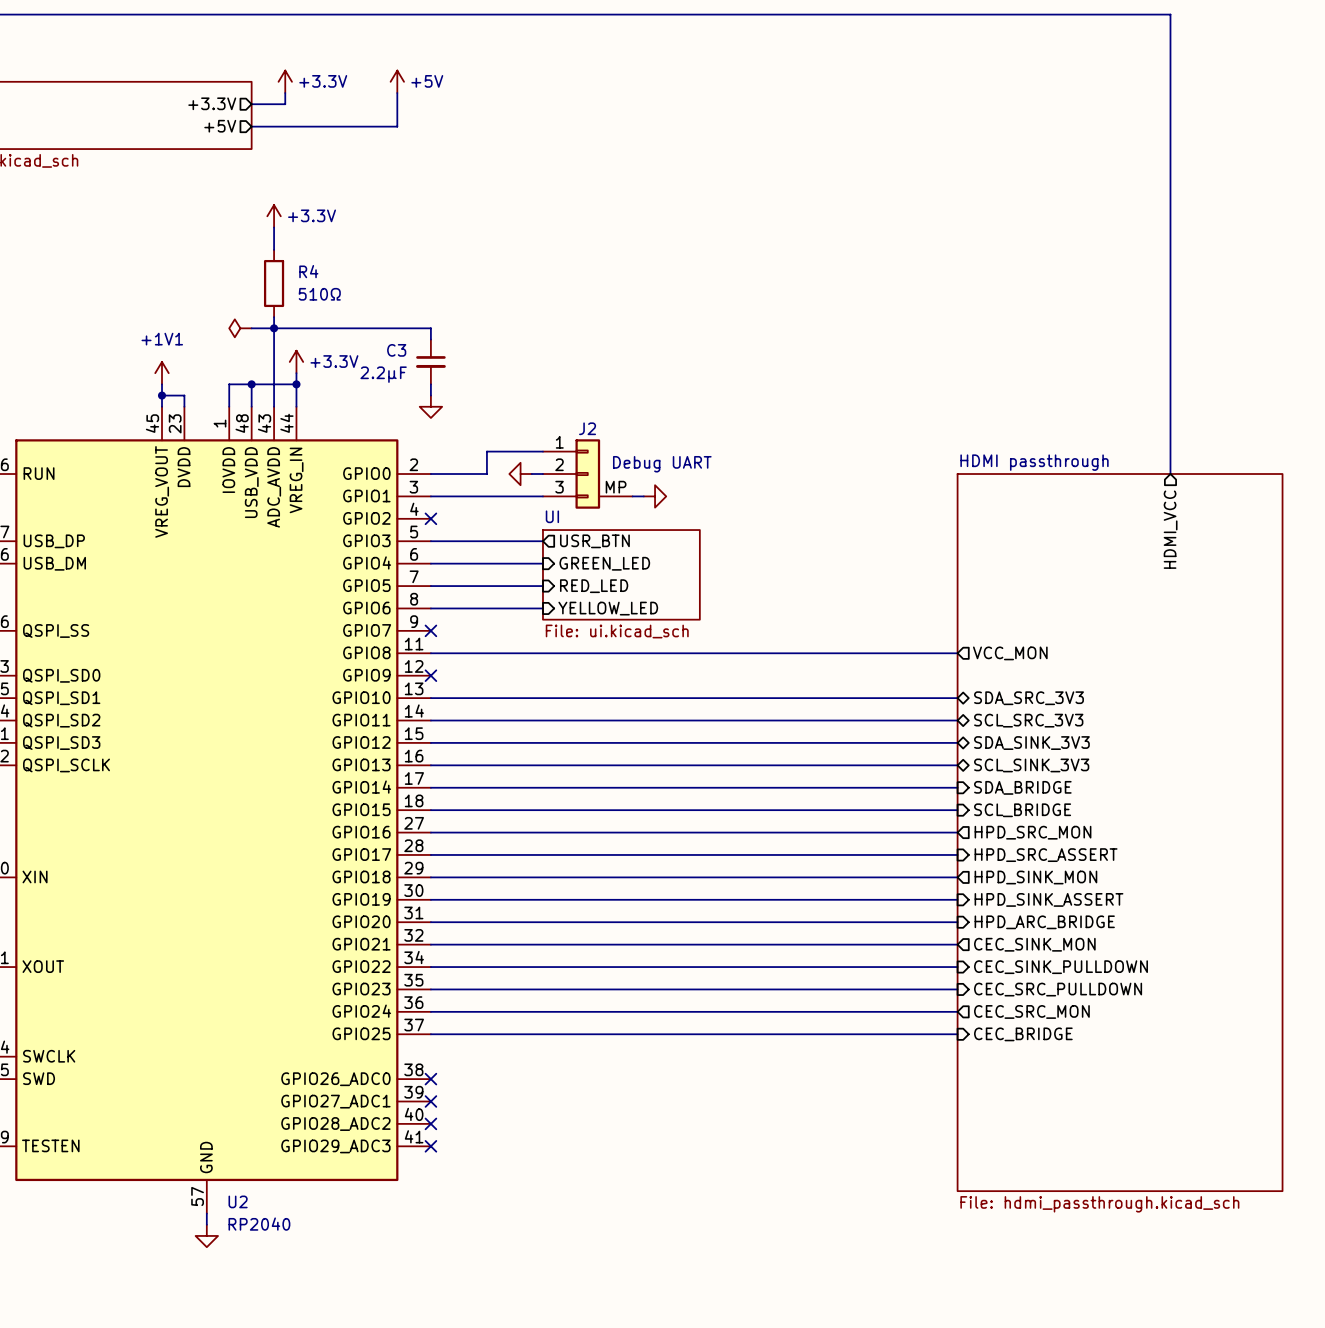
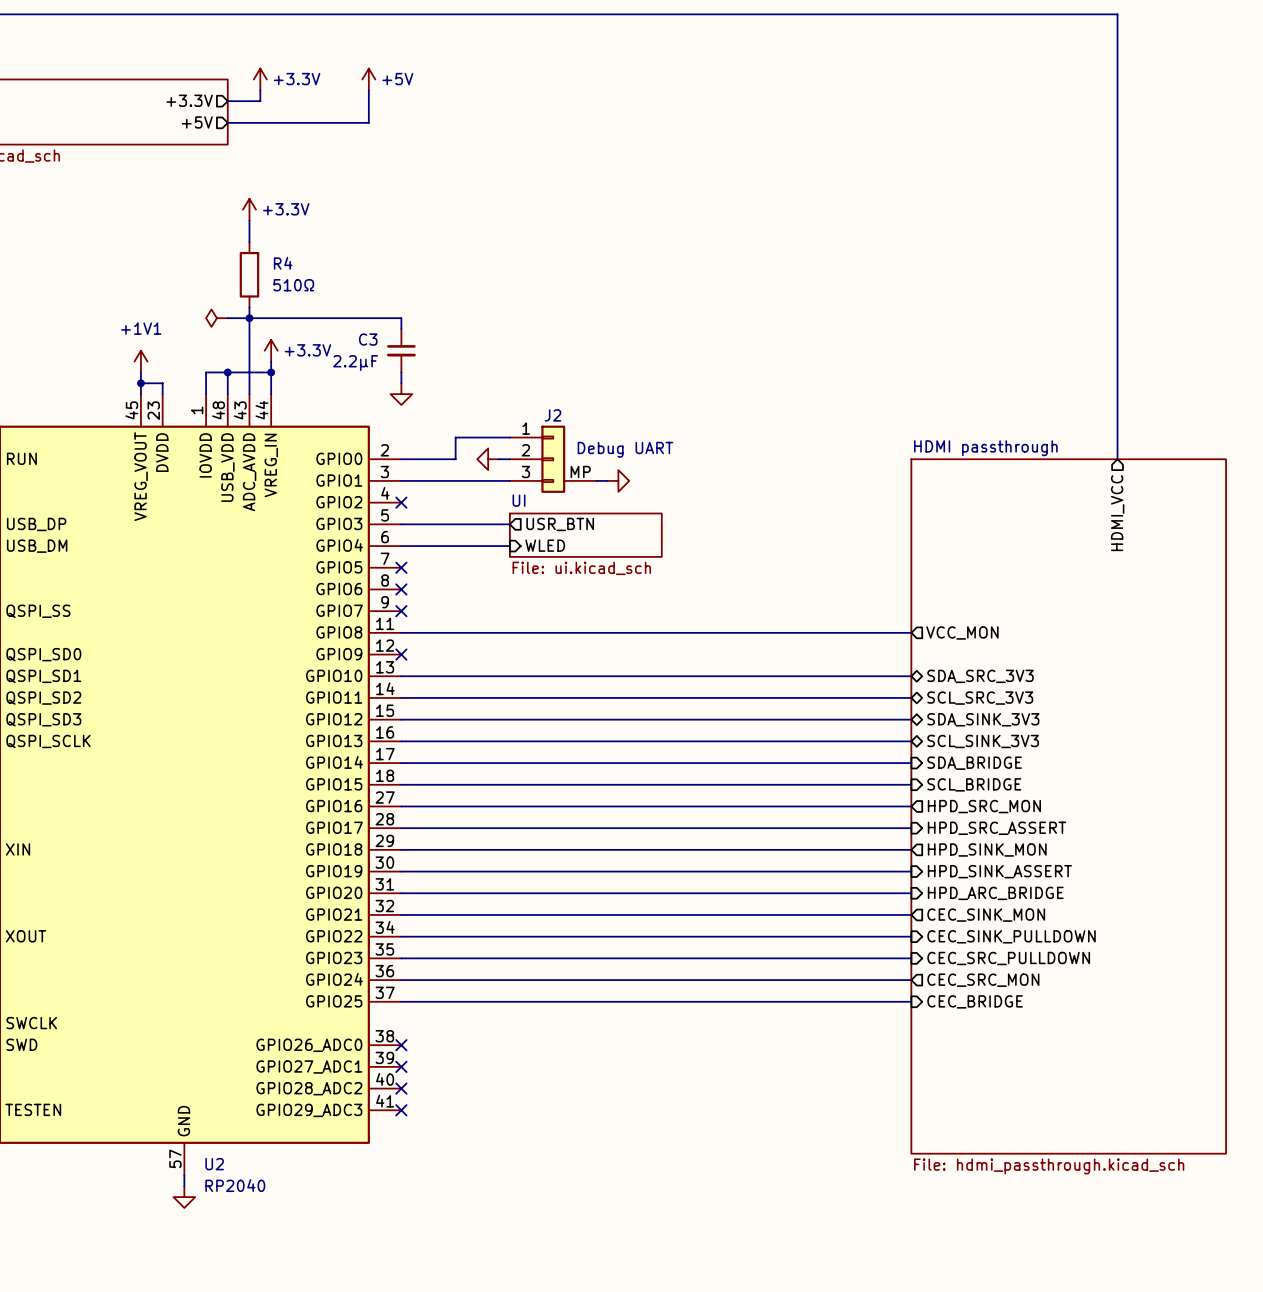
sheet UI: none -> File: ui.kicad_sch (585, 535)
sheet pin: GREEN_LED (604, 563) -> WLED (545, 545)
sheet UI: File: ui.kicad_sch (621, 574) -> none
wire: (430, 586) (542, 586) -> none
no-connect mark: none -> (401, 567)
sheet pin: RED_LED (594, 586) -> none
wire: (430, 608) (542, 608) -> none
no-connect mark: none -> (401, 589)
sheet pin: YELLOW_LED (608, 608) -> none

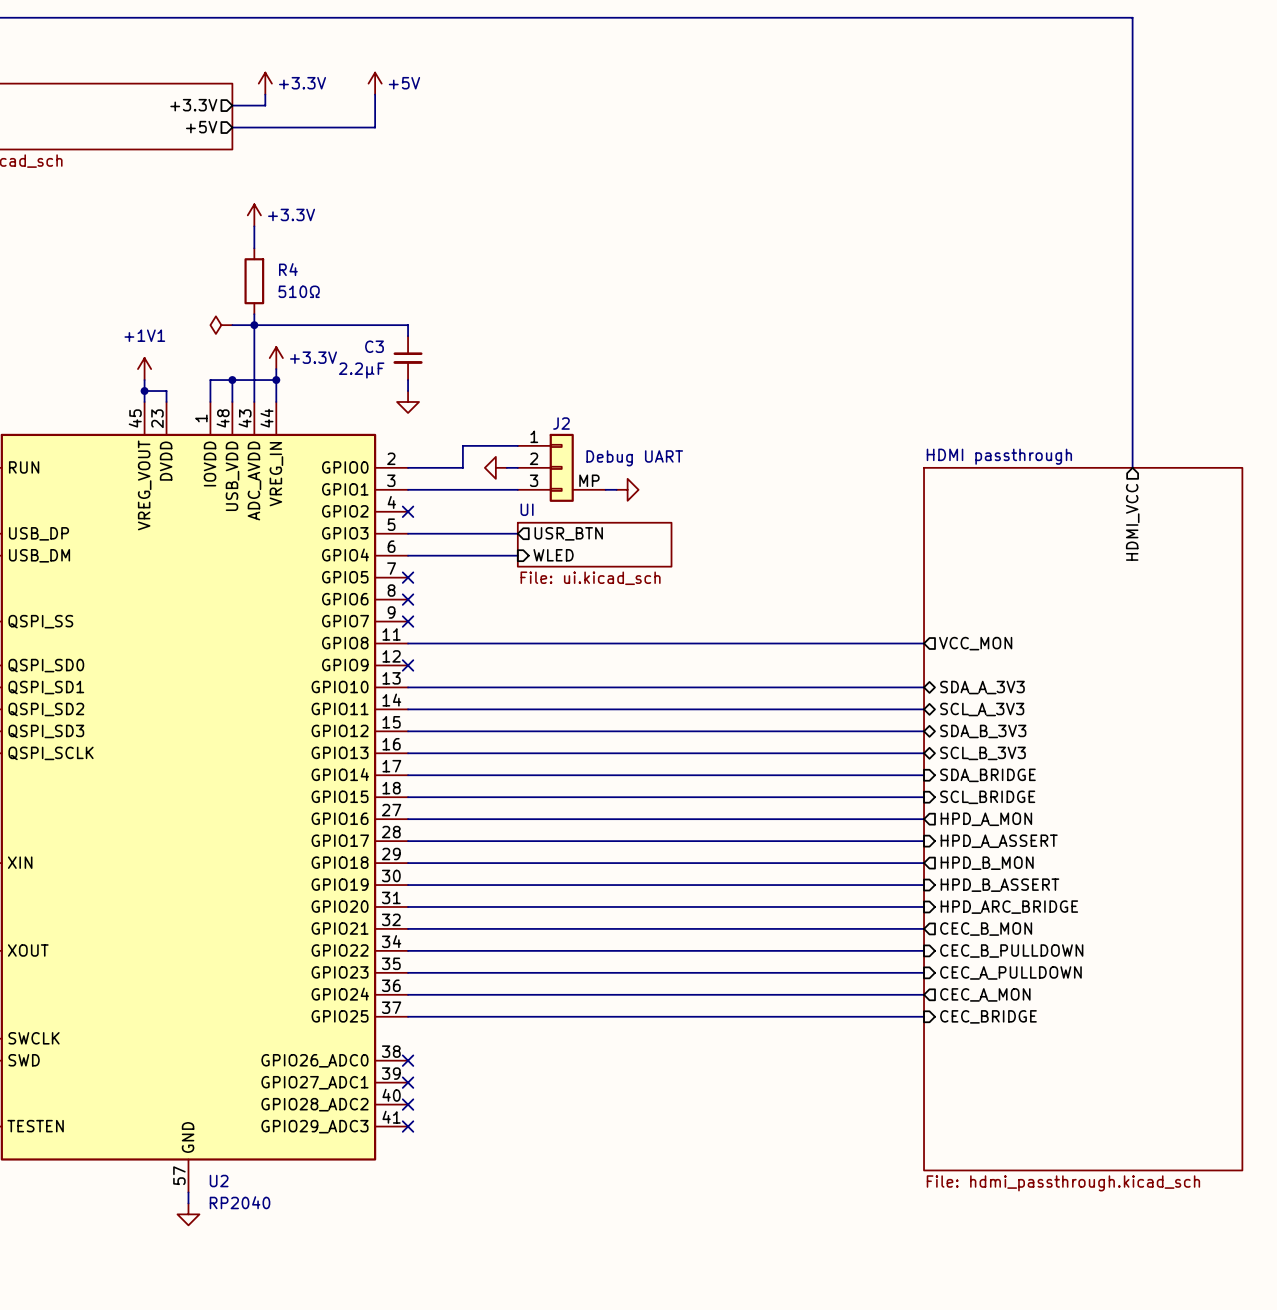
sheet pin: SDA_SRC_3V3 (980, 676) -> SDA_A_3V3 (982, 687)
sheet pin: SCL_SRC_3V3 (980, 698) -> SCL_A_3V3 (982, 709)
sheet pin: SDA_SINK_3V3 (983, 719) -> SDA_B_3V3 (983, 731)
sheet pin: SCL_SINK_3V3 (983, 741) -> SCL_B_3V3 (983, 753)
sheet pin: HPD_SRC_MON (984, 806) -> HPD_A_MON (986, 819)
sheet pin: HPD_SRC_ASSERT (997, 828) -> HPD_A_ASSERT (999, 841)
sheet pin: HPD_SINK_MON (987, 849) -> HPD_B_MON (987, 863)
sheet pin: HPD_SINK_ASSERT (999, 871) -> HPD_B_ASSERT (999, 885)
sheet pin: CEC_SINK_MON (986, 915) -> CEC_B_MON (986, 929)
sheet pin: CEC_SINK_PULLDOWN (1011, 936) -> CEC_B_PULLDOWN (1011, 951)
sheet pin: CEC_SRC_PULLDOWN (1008, 958) -> CEC_A_PULLDOWN (1010, 972)
sheet pin: CEC_SRC_MON (983, 980) -> CEC_A_MON (985, 994)

